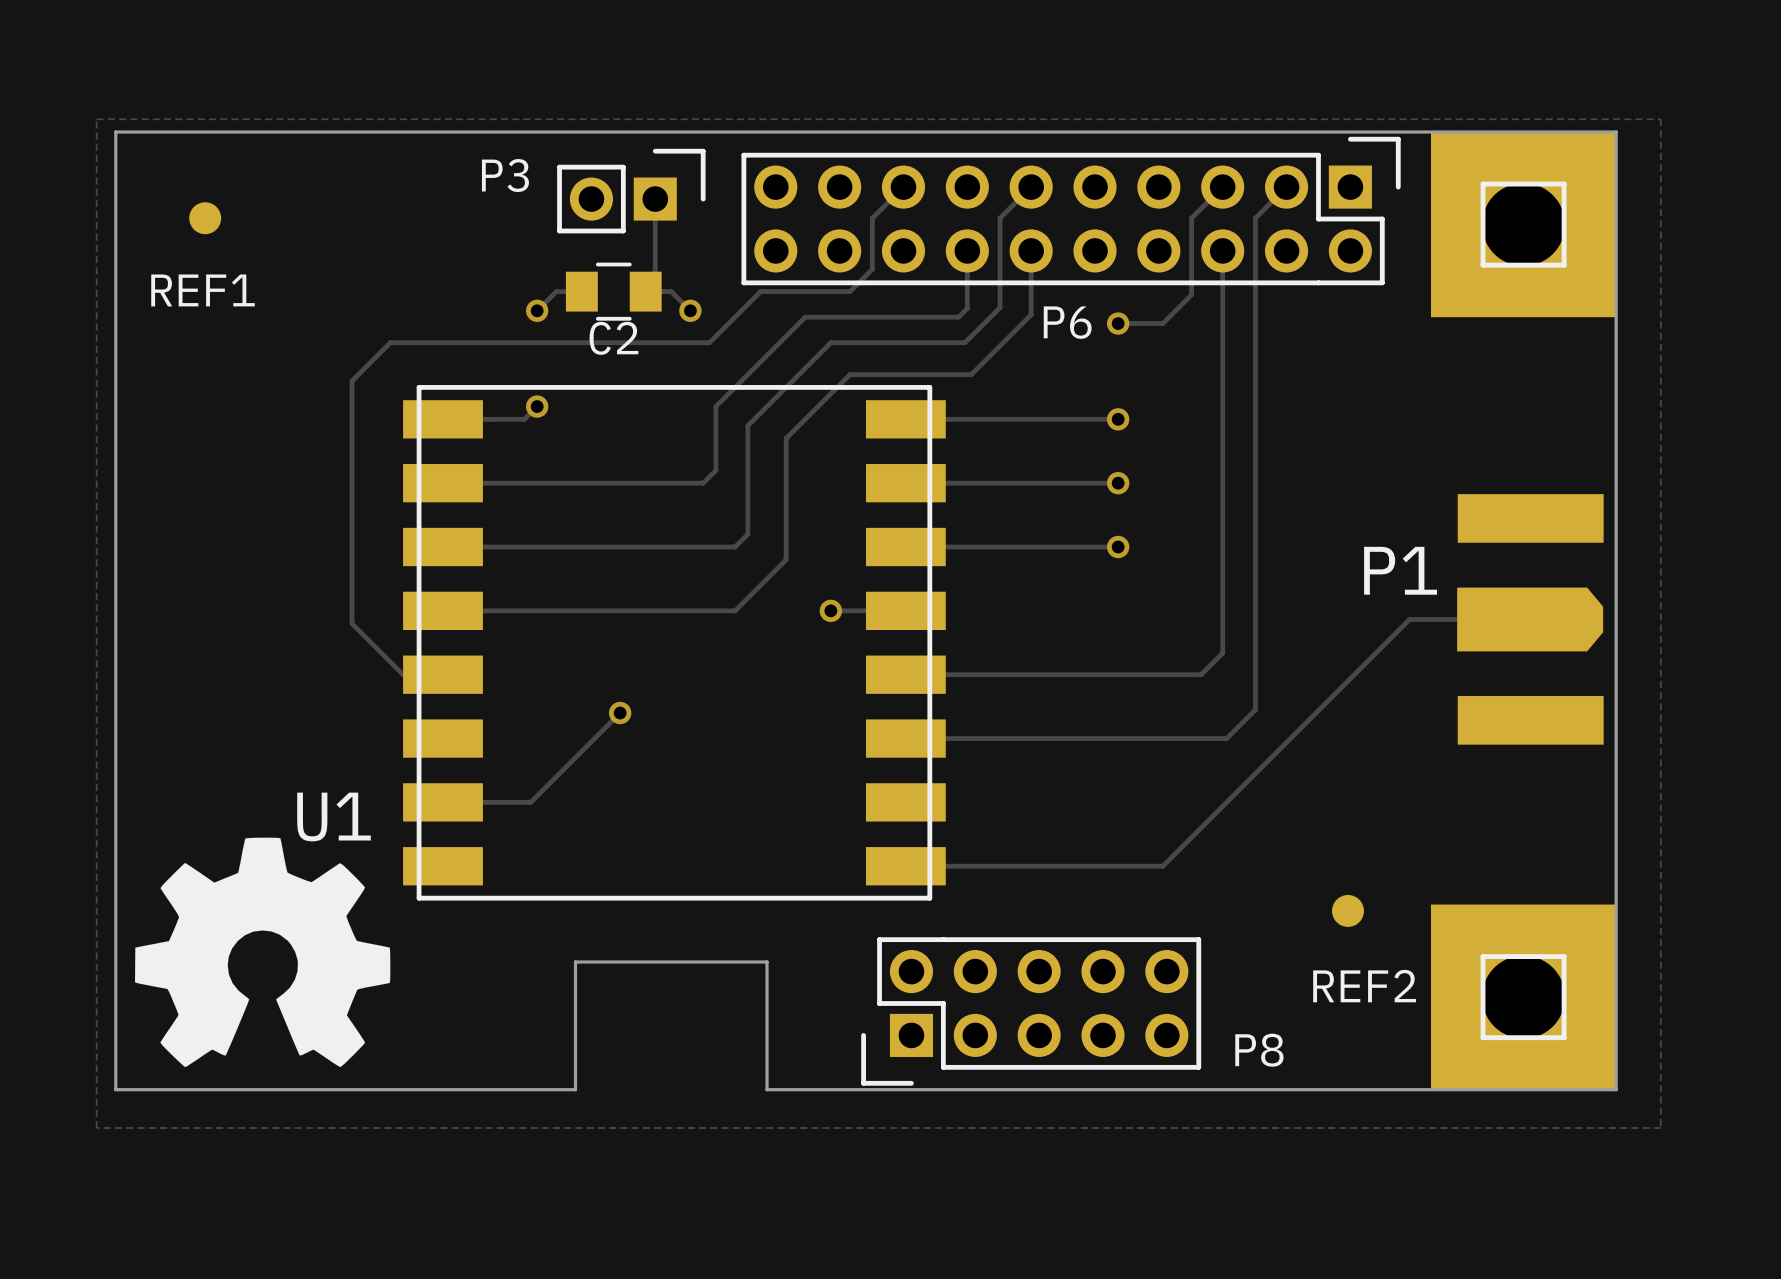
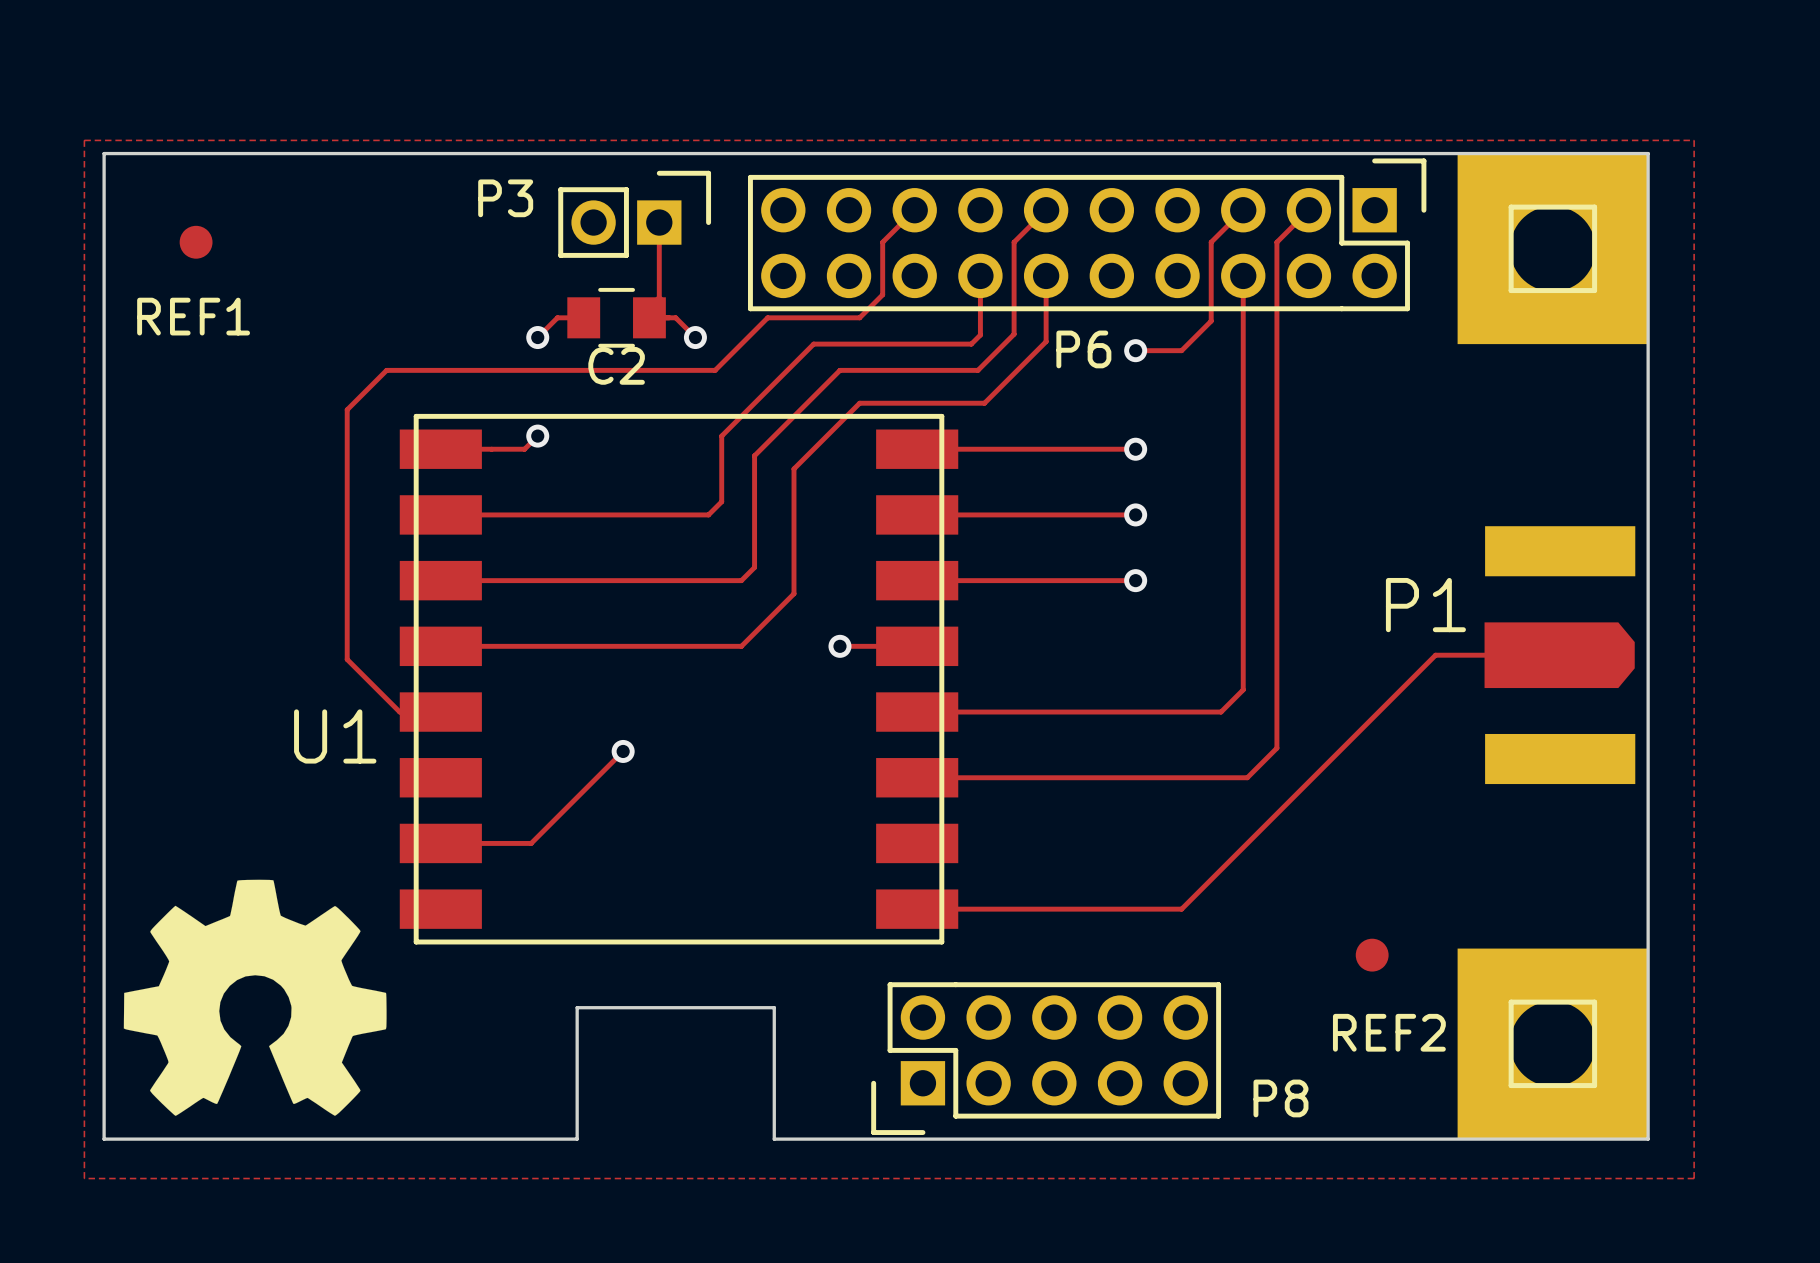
U1 name position: U1 (334, 816) -> U1 (335, 736)

